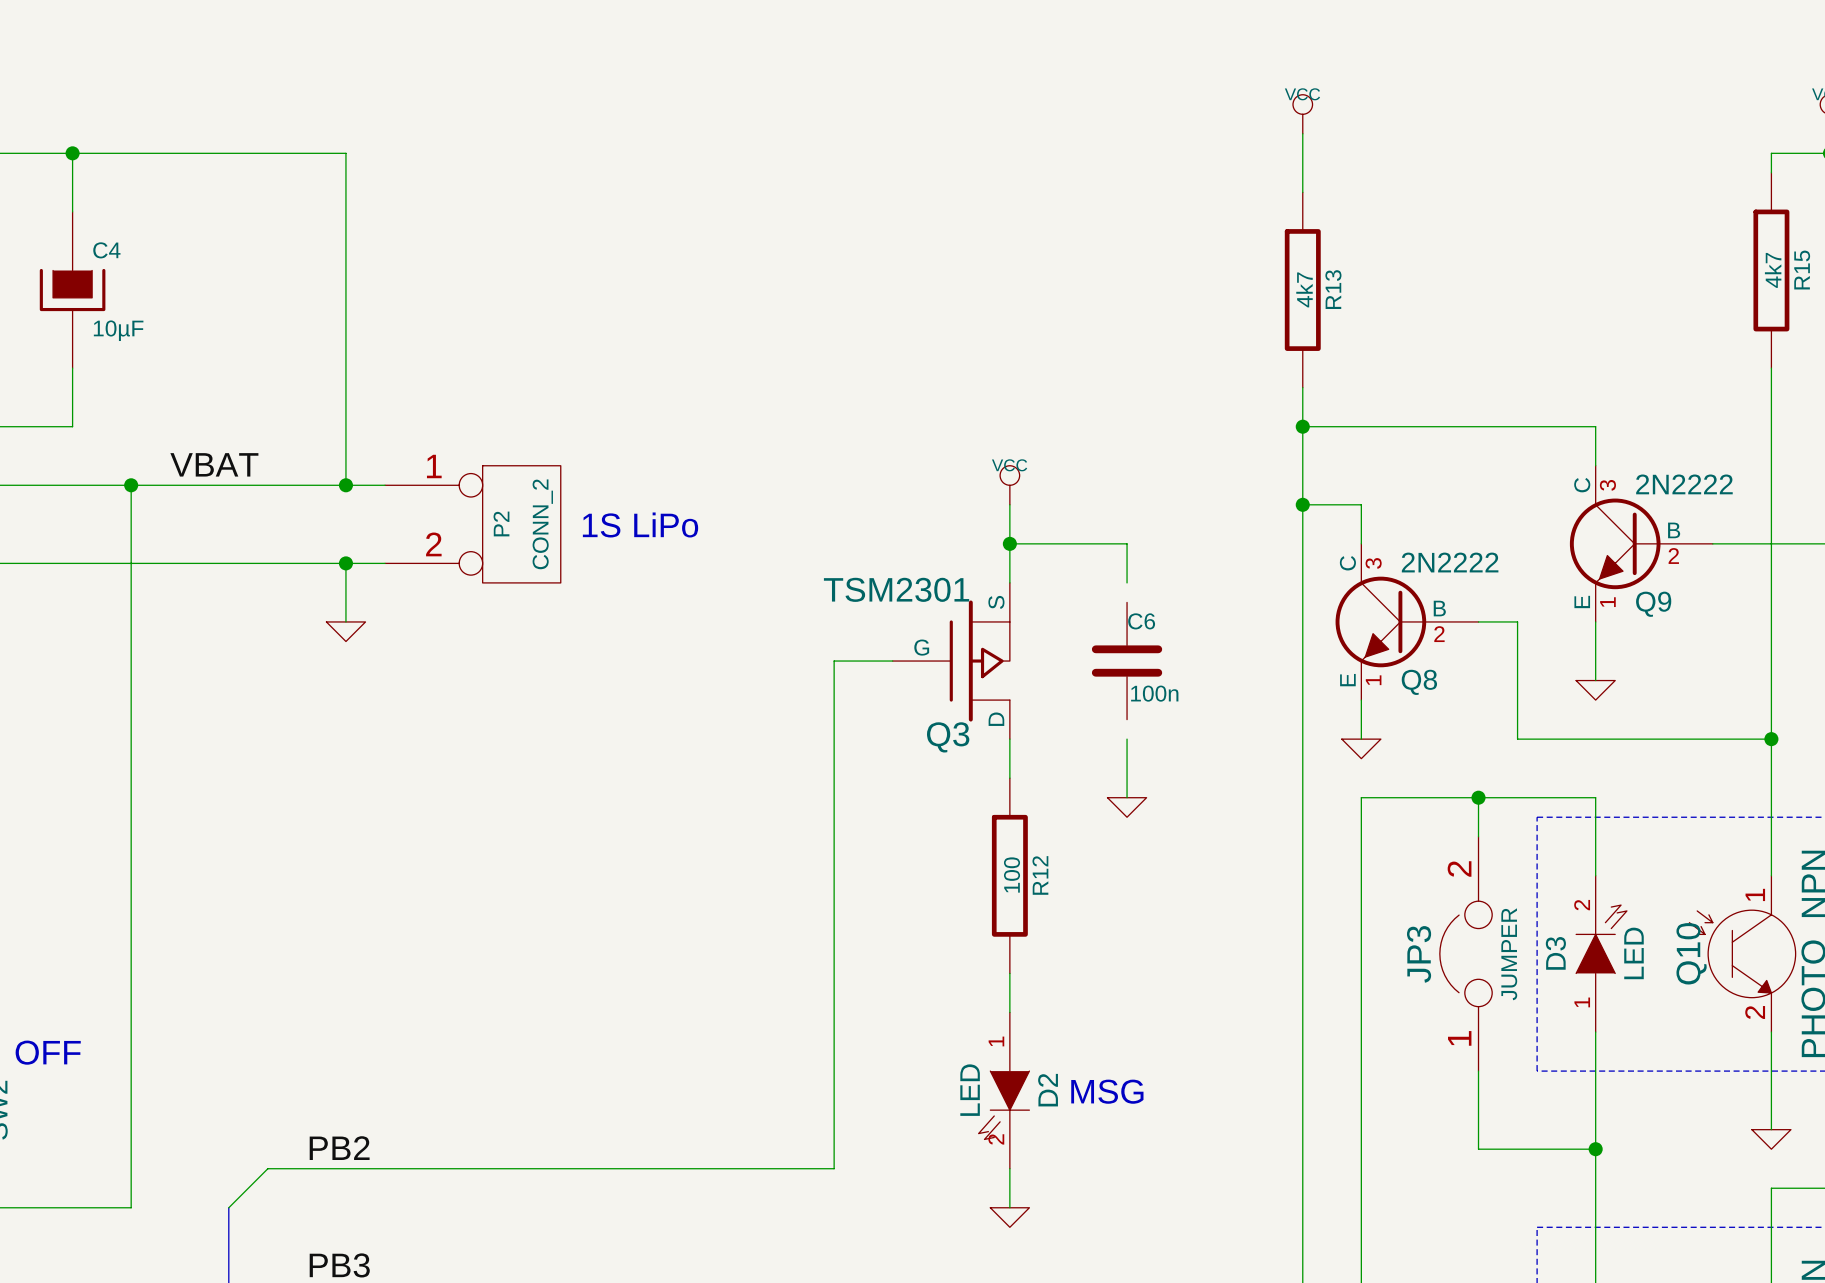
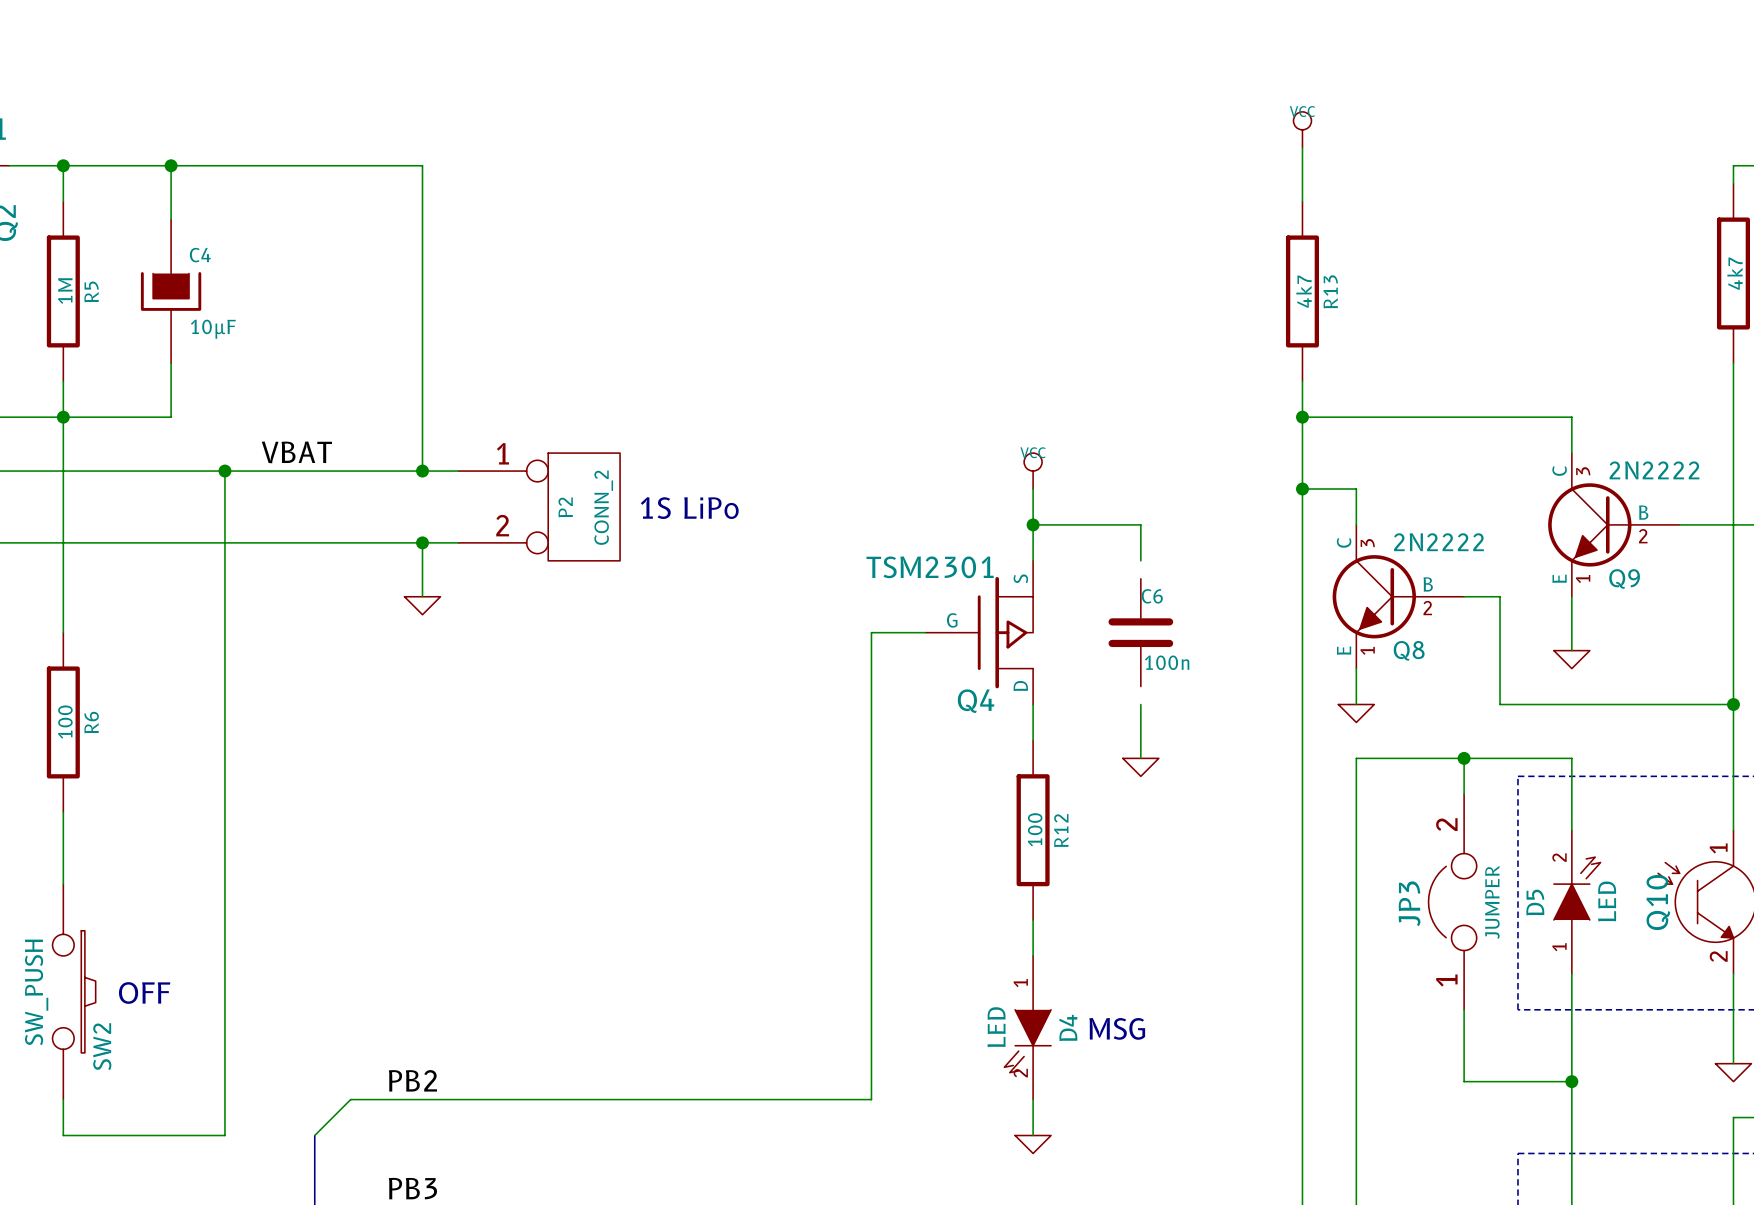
Q3 name: Q3 (948, 737) -> Q4 (976, 701)
D3 name: D3 (1555, 953) -> D5 (1535, 902)
D2 name: D2 (1048, 1090) -> D4 (1068, 1027)

